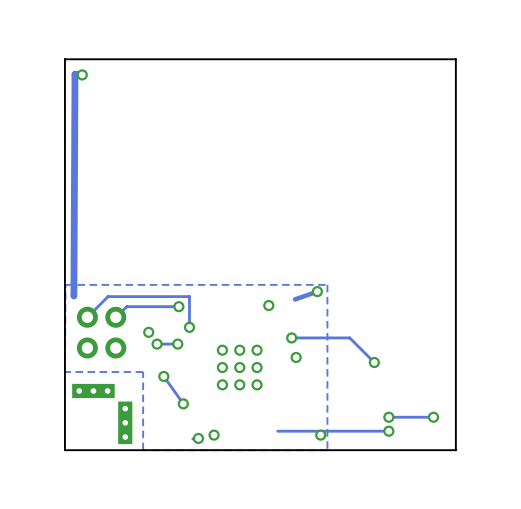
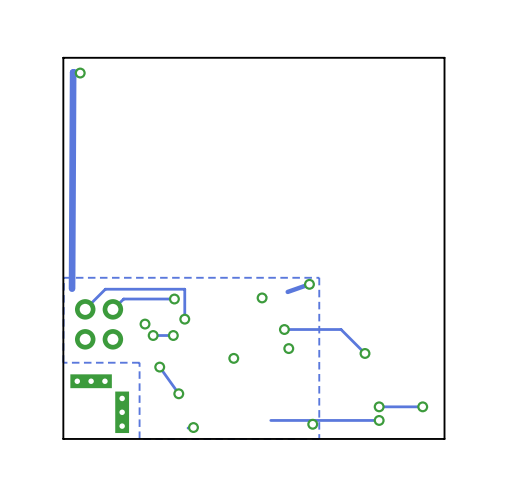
via: (222, 350) -> none
via: (239, 350) -> none
via: (257, 350) -> none
via: (222, 367) -> none
via: (257, 367) -> none
via: (222, 384) -> none
via: (239, 384) -> none
via: (257, 384) -> none
via: (214, 435) -> none

